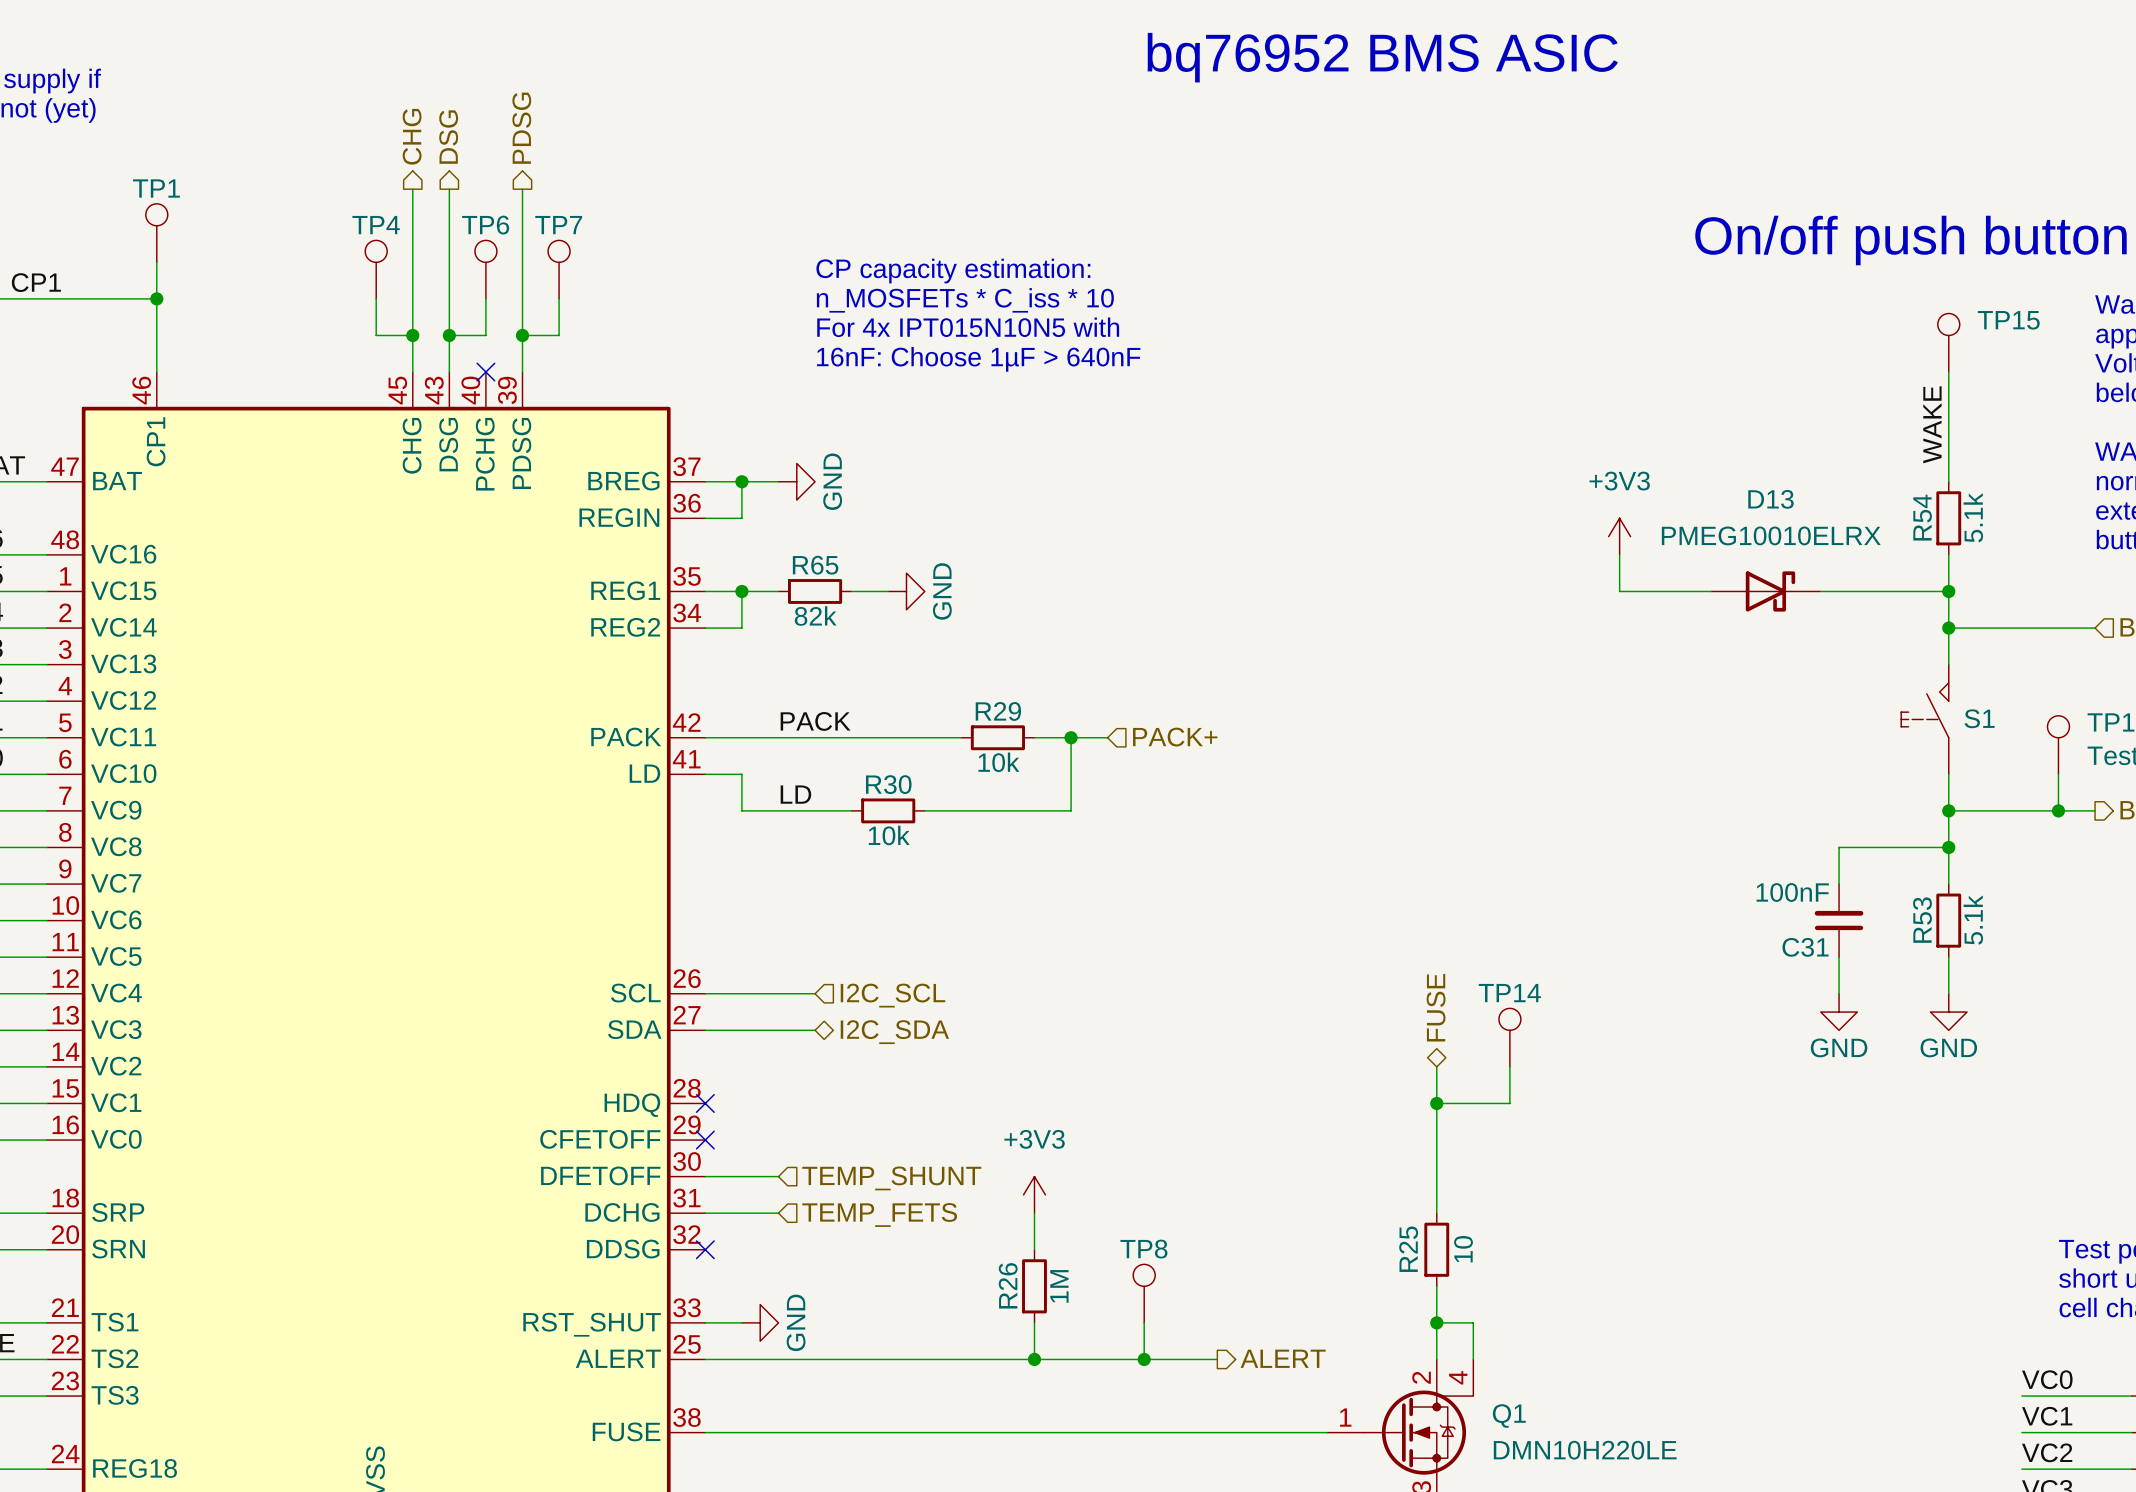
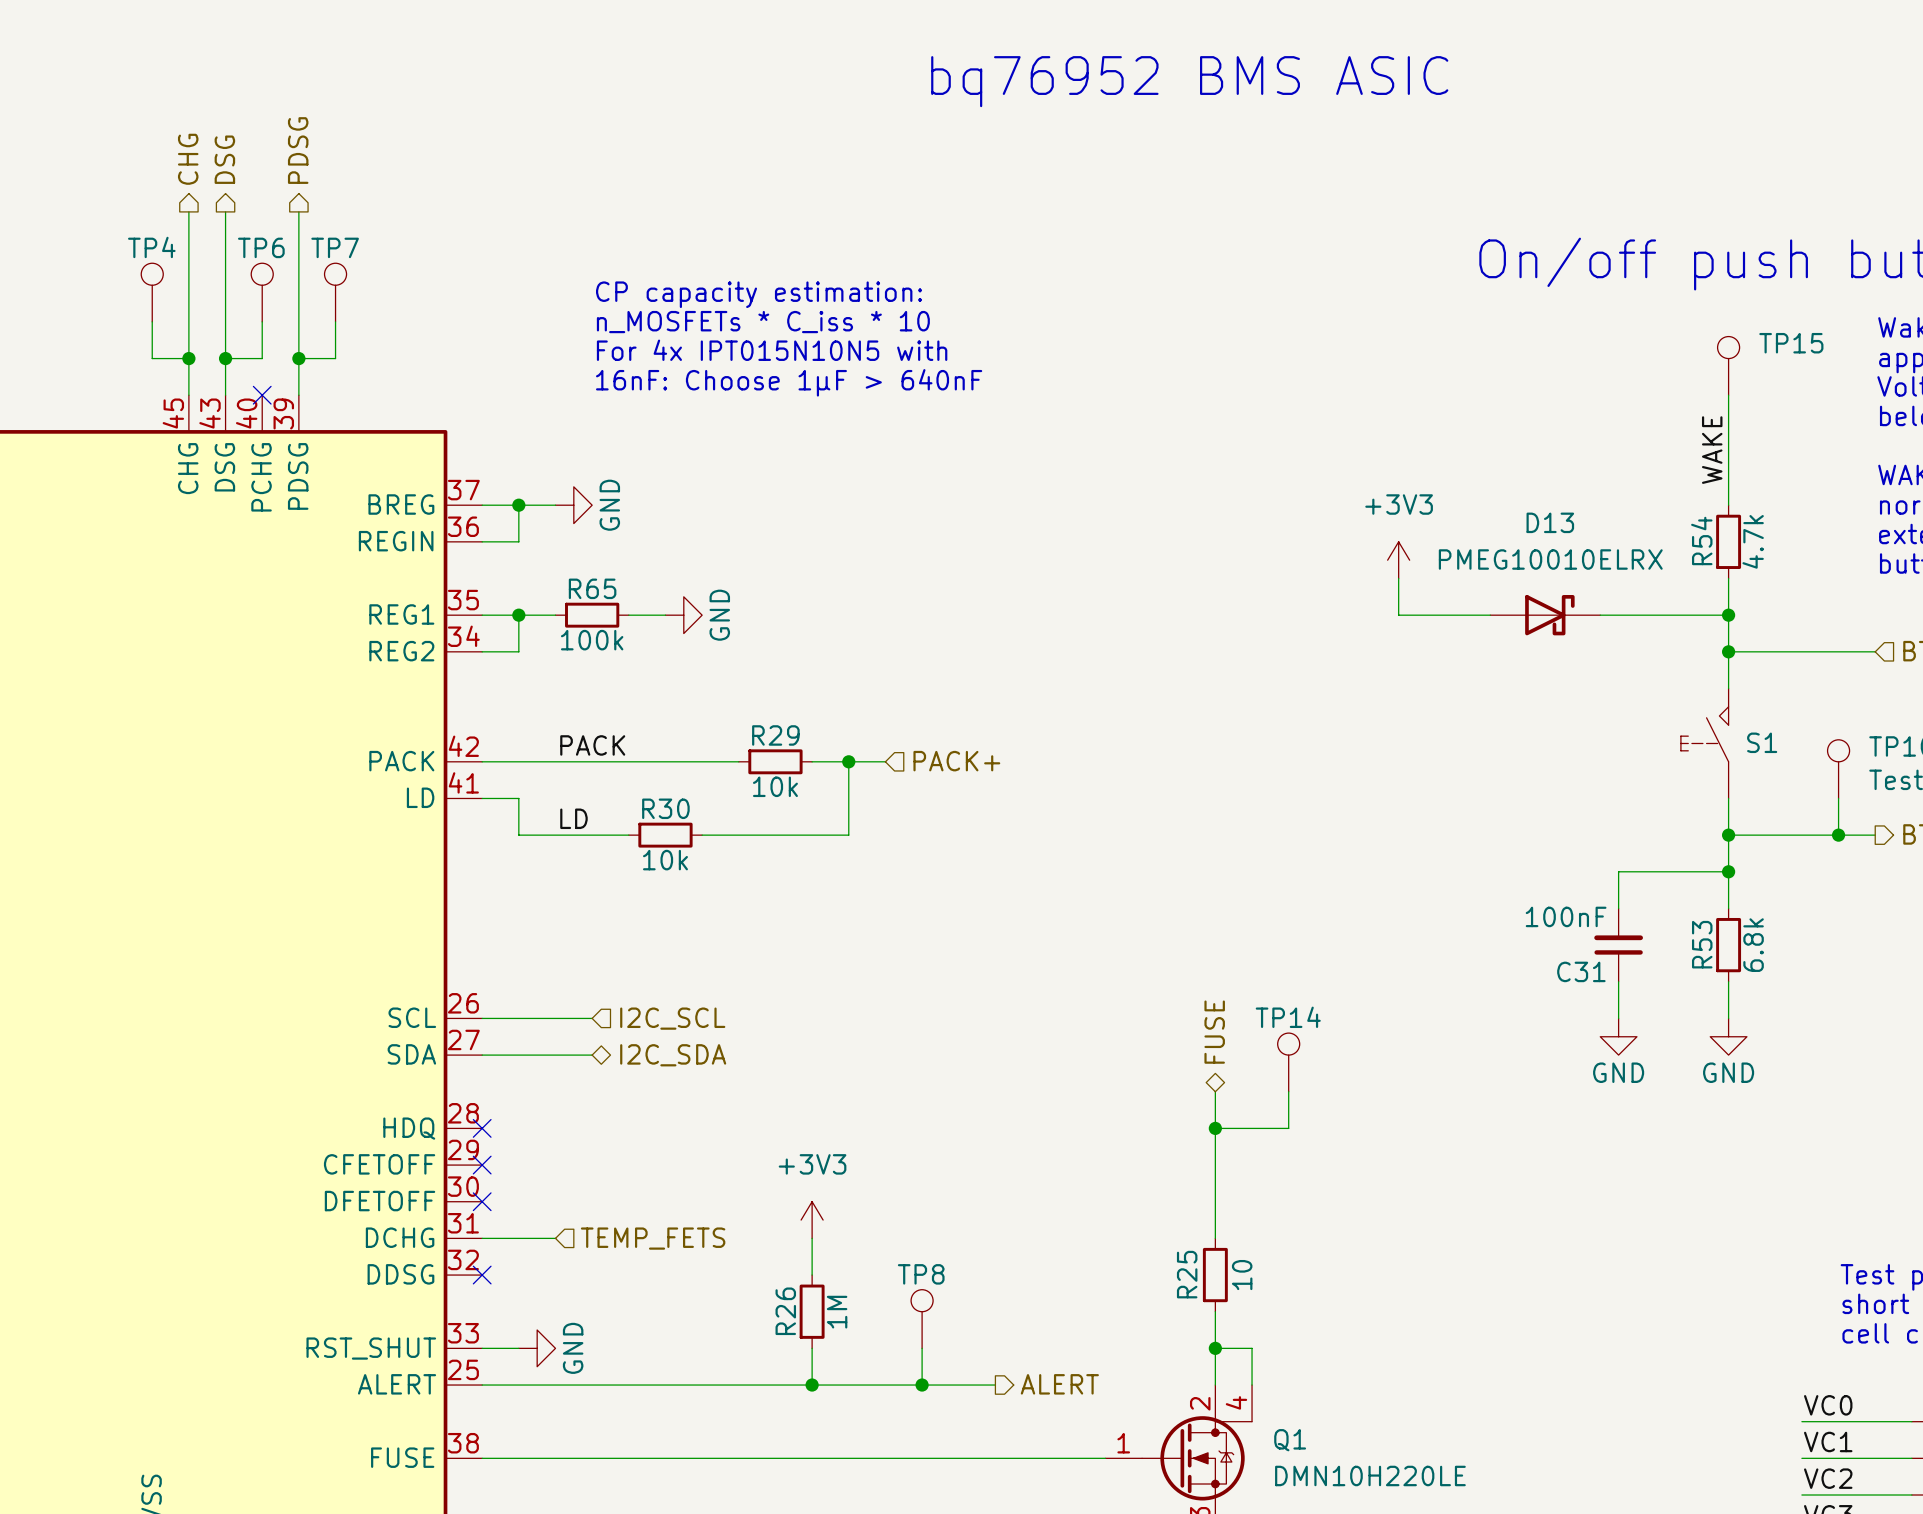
R54 value: 5.1k (1973, 517) -> 4.7k (1753, 541)
R65 value: 82k (815, 616) -> 100k (592, 640)
R53 value: 5.1k (1973, 920) -> 6.8k (1753, 945)
wire: (705, 1176) (778, 1176) -> none
no-connect mark: none -> (482, 1201)
hierarchical label: TEMP_SHUNT (891, 1178) -> none

